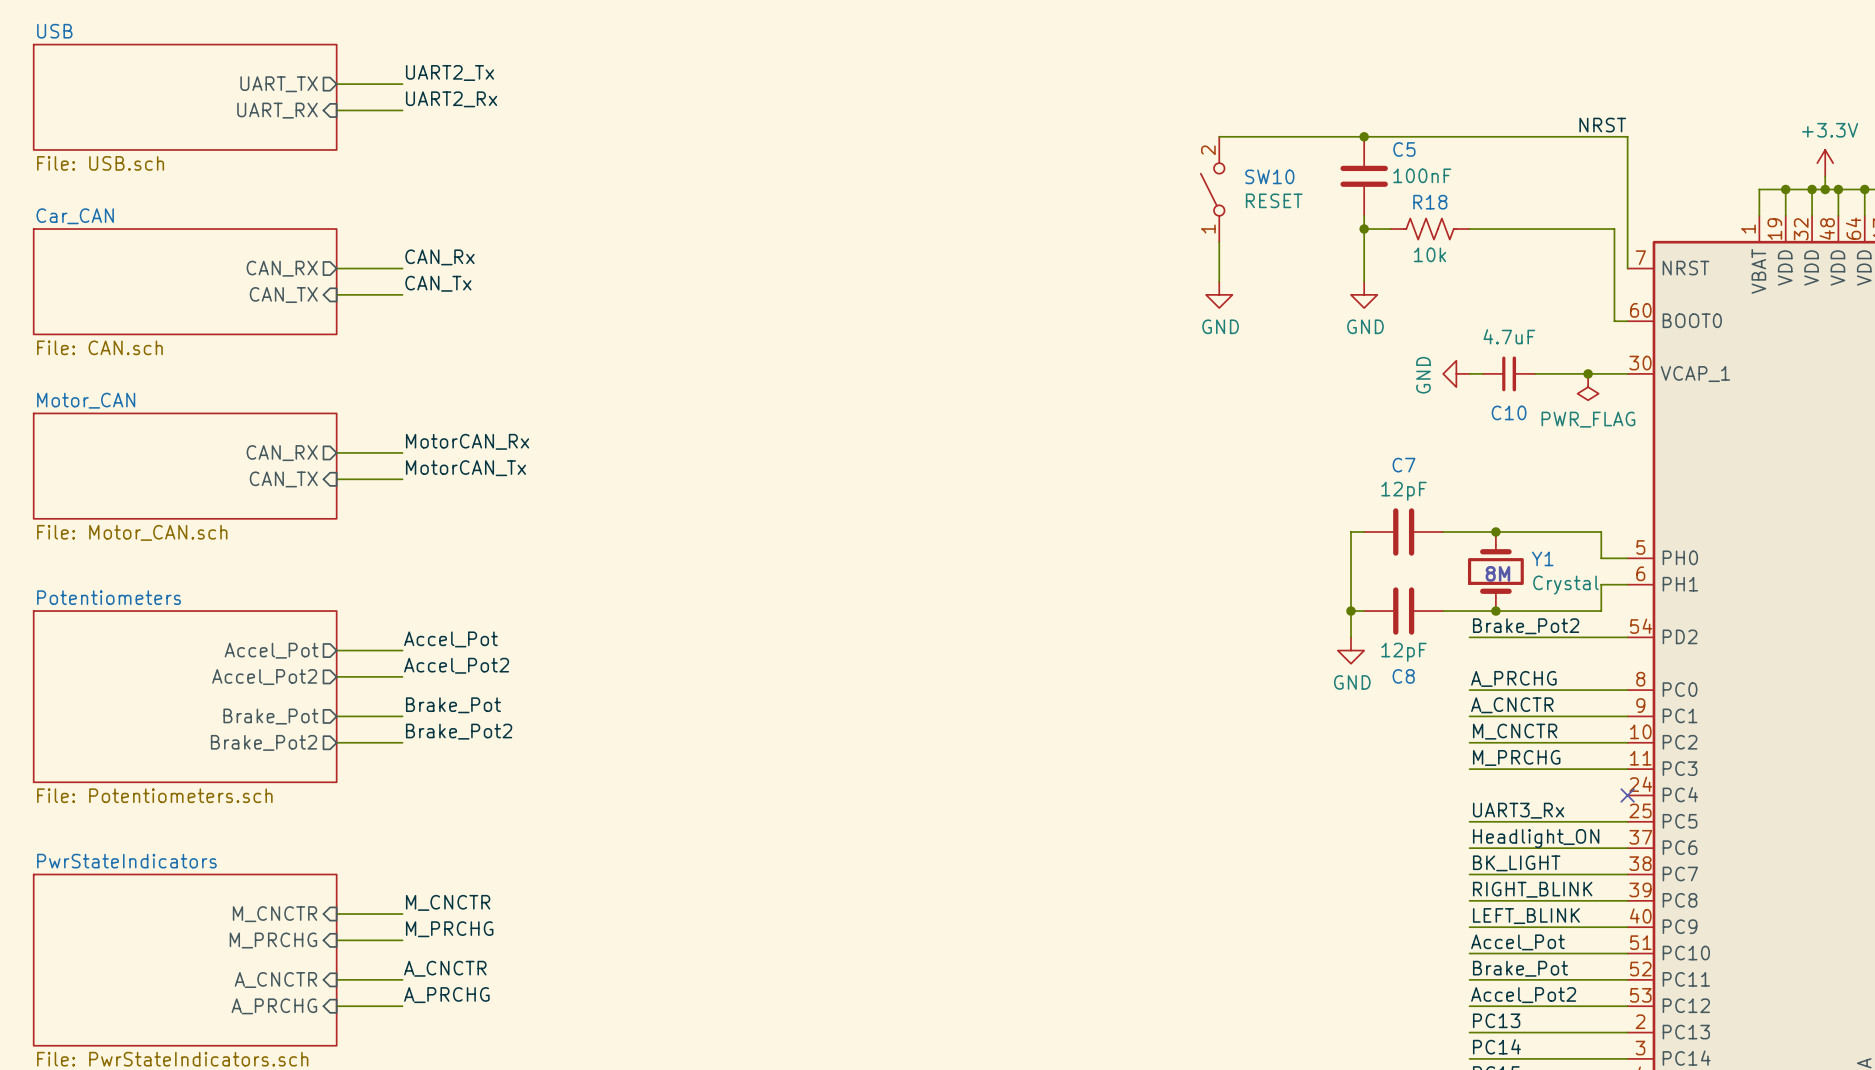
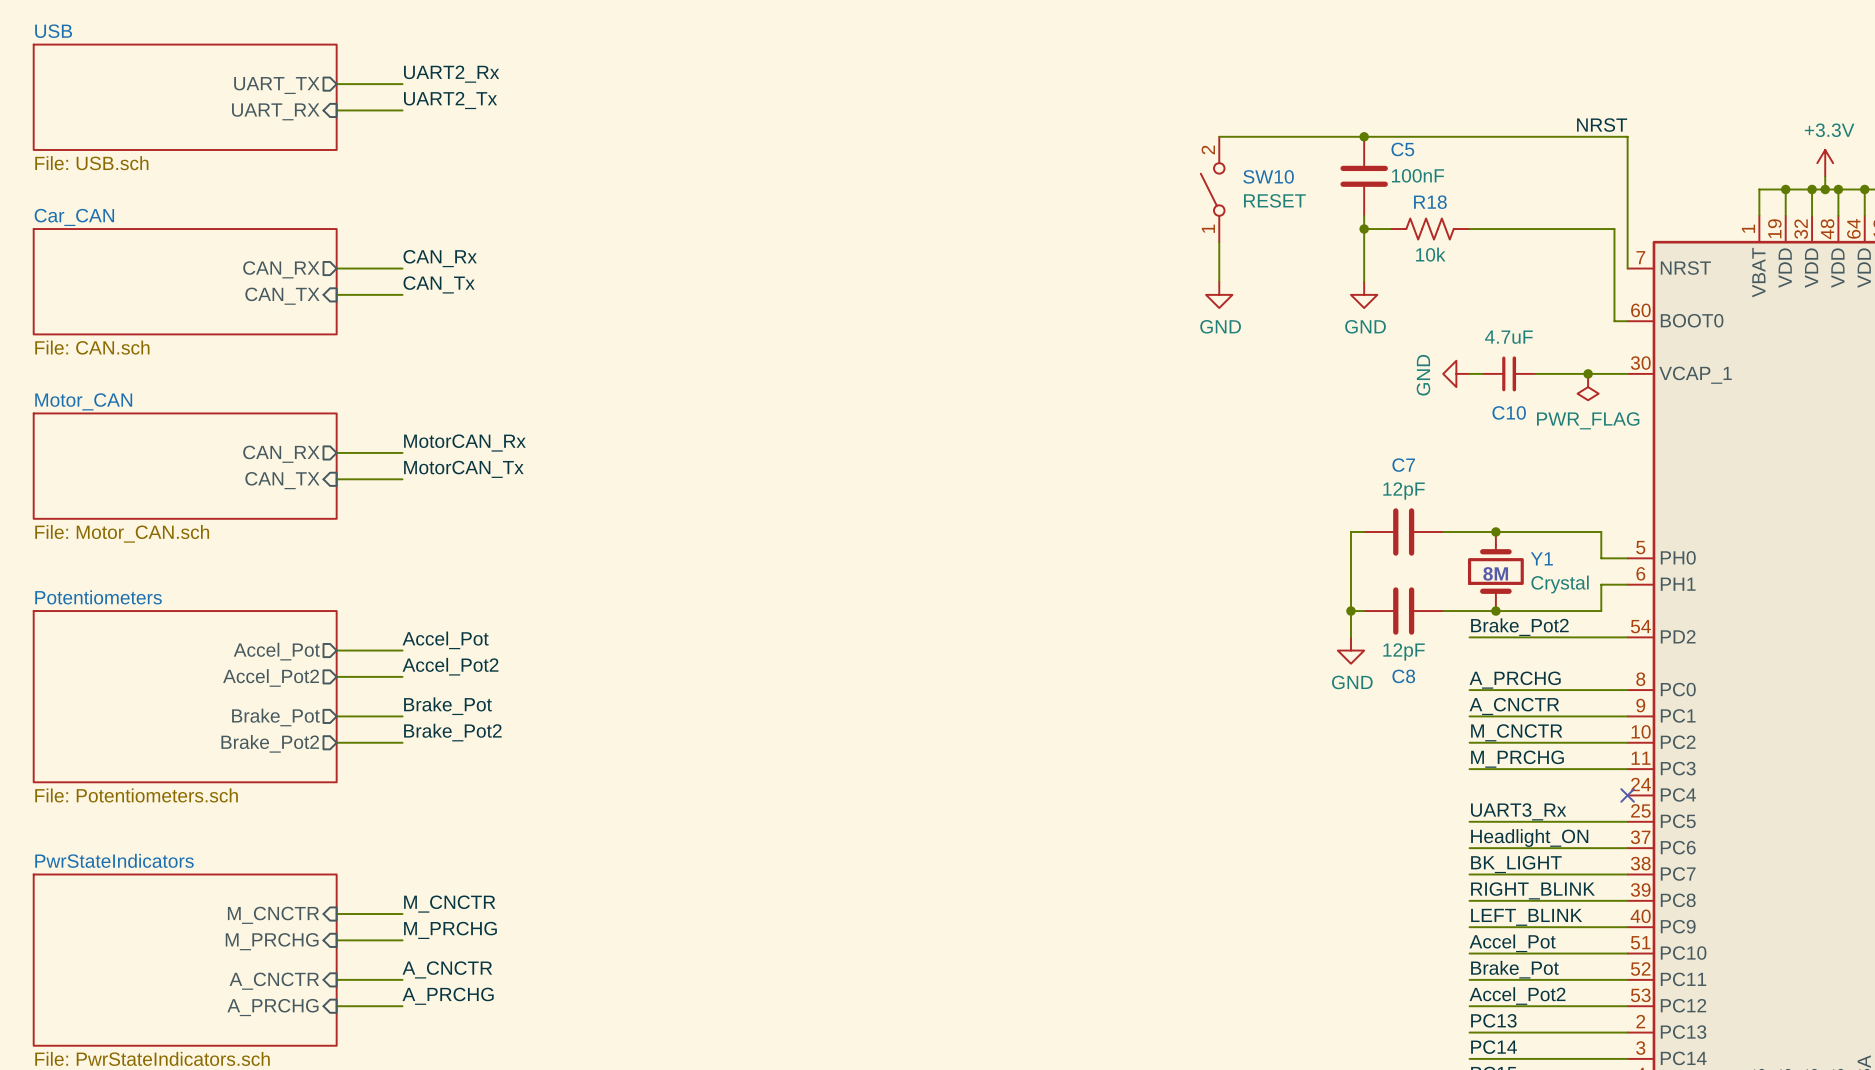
label: UART2_Tx (449, 72) -> UART2_Rx (451, 74)
label: UART2_Rx (451, 99) -> UART2_Tx (450, 100)

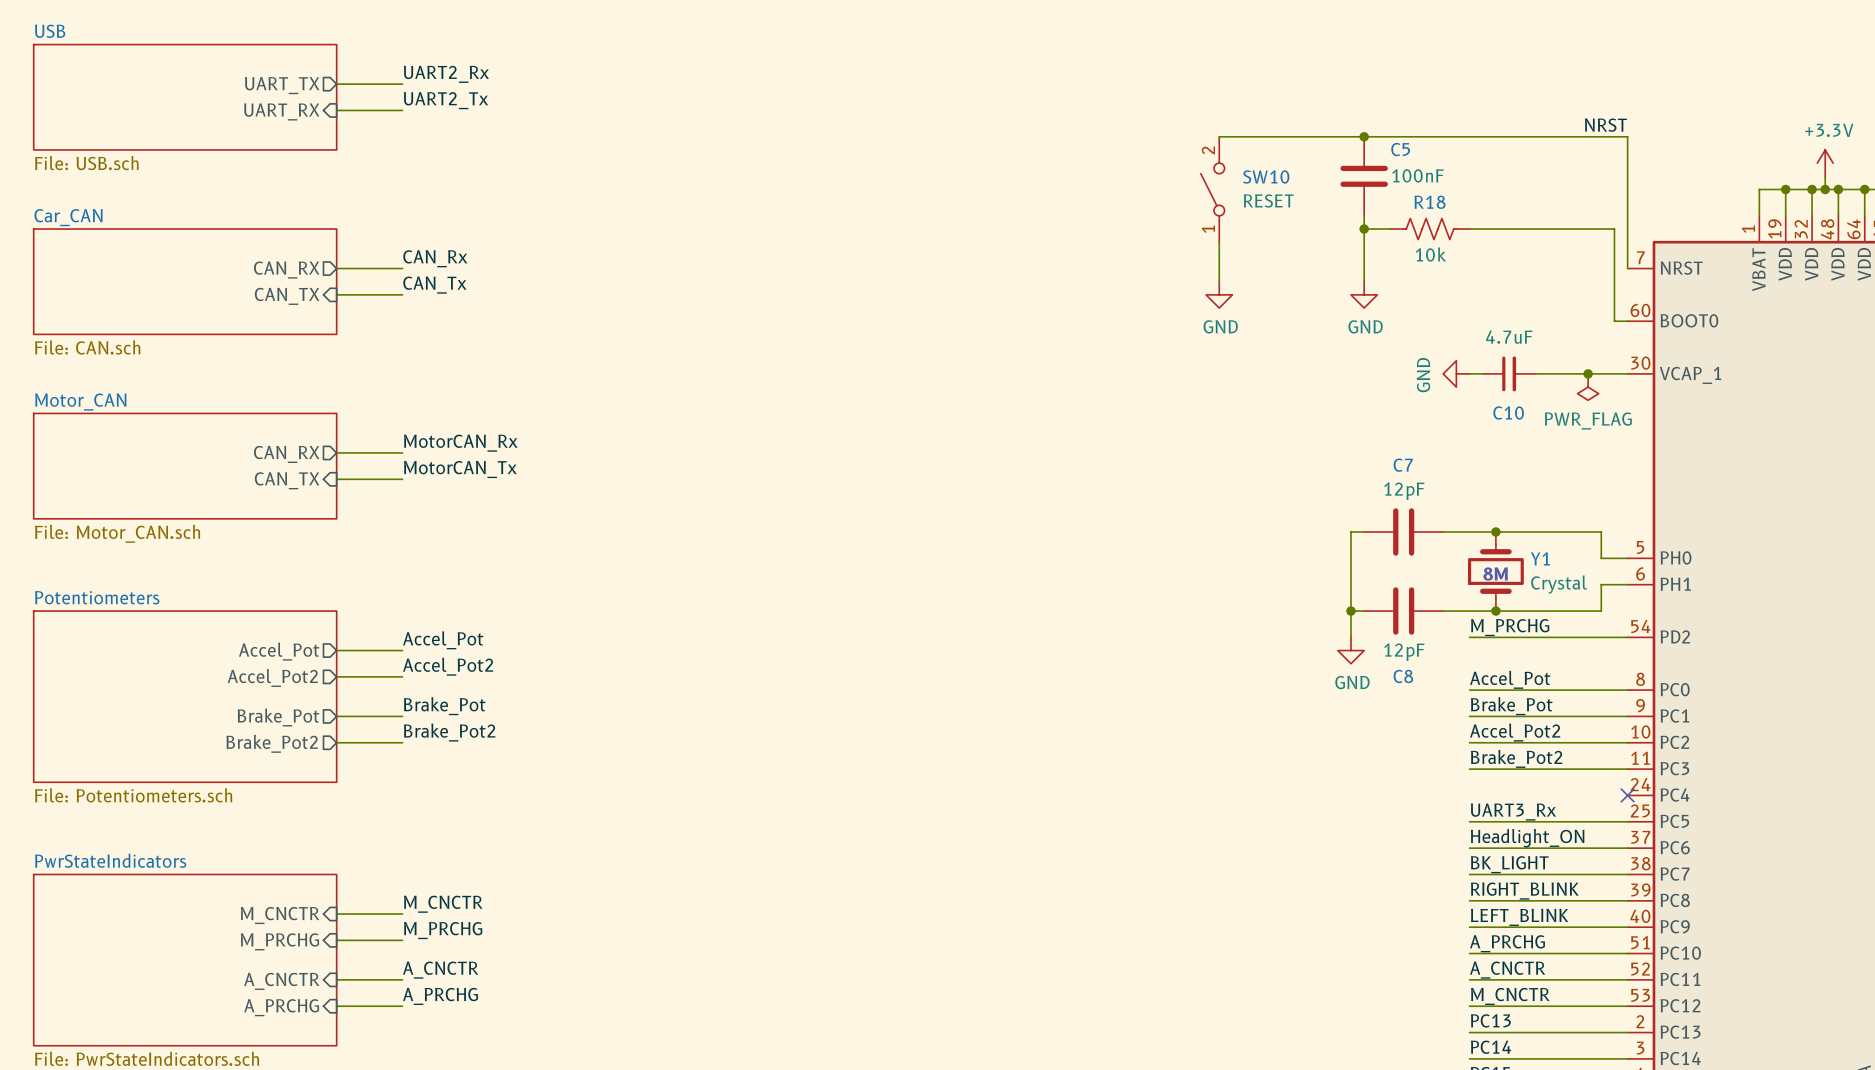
label: Brake_Pot2 (1519, 627) -> M_PRCHG (1510, 627)
label: A_PRCHG (1515, 680) -> Accel_Pot (1510, 679)
label: A_CNCTR (1514, 706) -> Brake_Pot (1511, 706)
label: M_CNCTR (1516, 732) -> Accel_Pot2 (1515, 732)
label: M_PRCHG (1517, 759) -> Brake_Pot2 (1516, 758)
label: Accel_Pot (1512, 943) -> A_PRCHG (1507, 943)
label: Brake_Pot (1514, 969) -> A_CNCTR (1507, 970)
label: Accel_Pot2 (1517, 996) -> M_CNCTR (1510, 996)

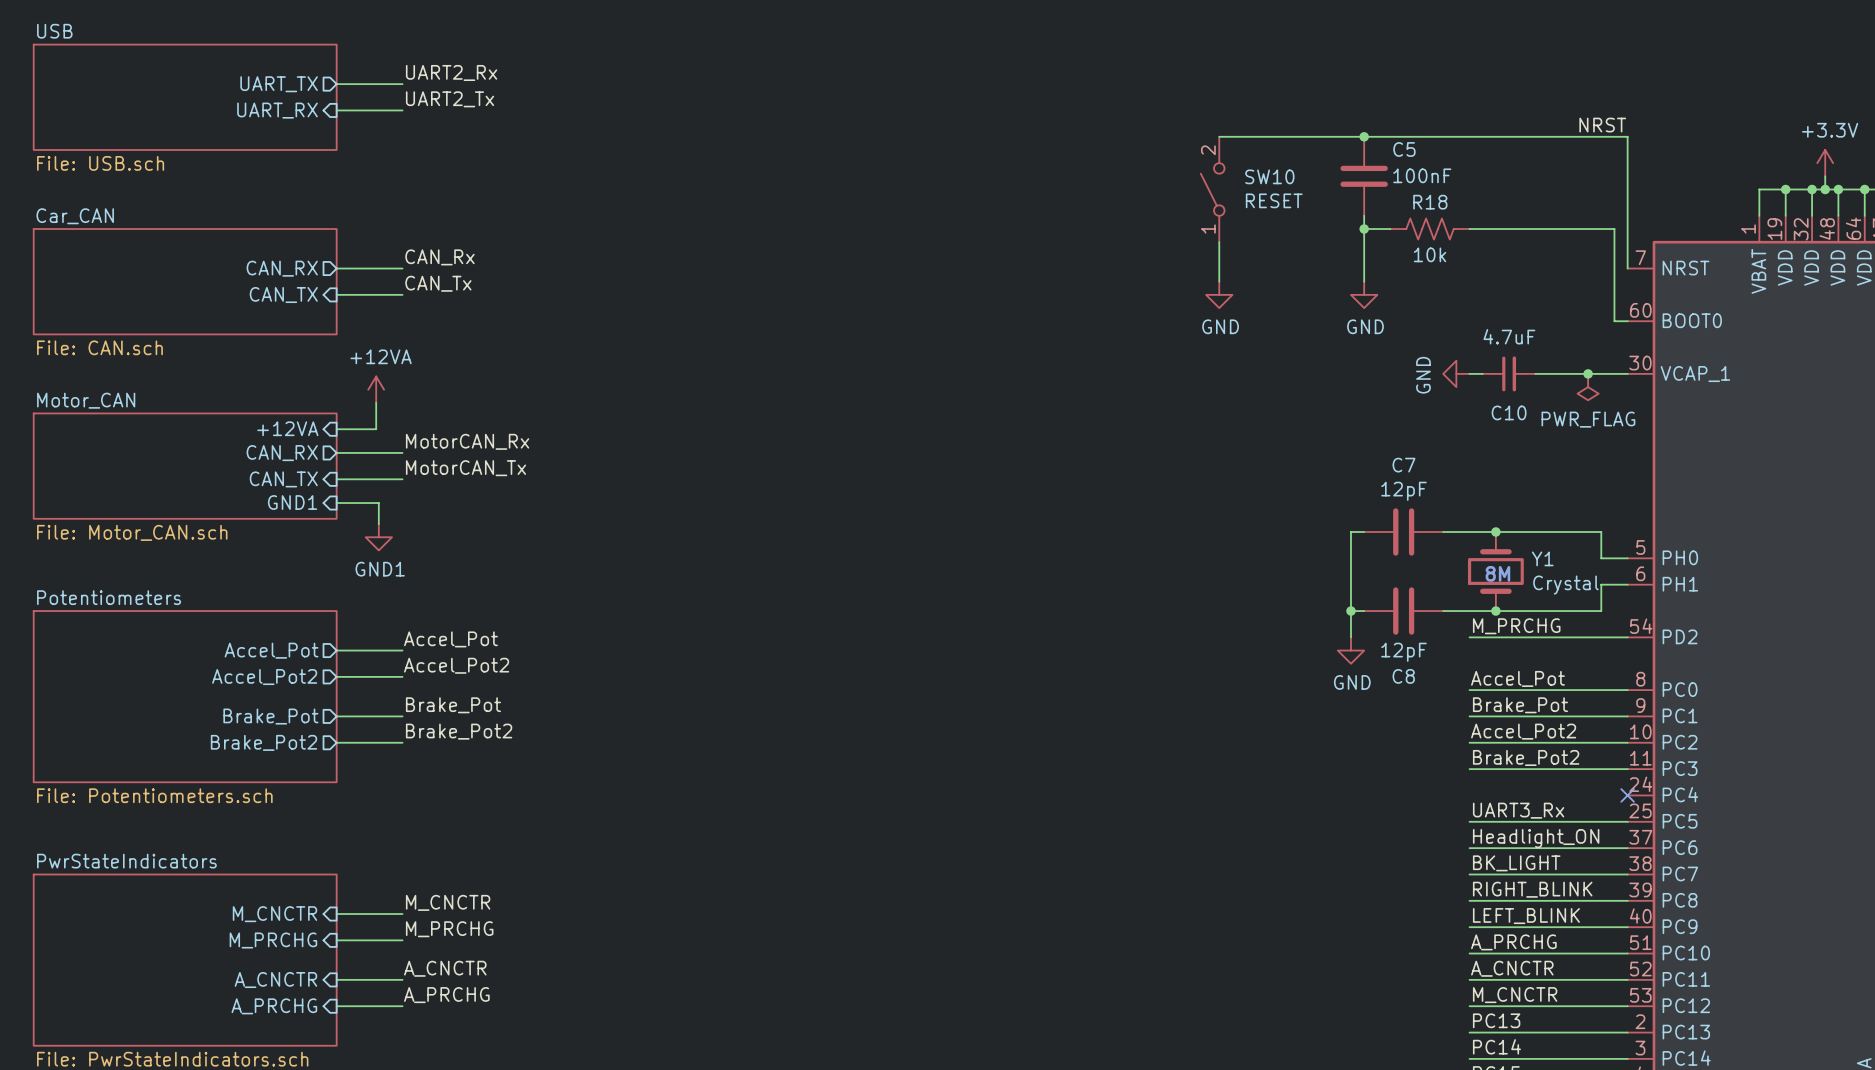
power symbol: none -> +12VA (376, 389)
wire: none -> (376, 402) (376, 429) (336, 429)
sheet pin: none -> +12VA (287, 428)
sheet pin: none -> GND1 (292, 502)
wire: none -> (336, 503) (378, 503) (378, 524)
power symbol: none -> GND1 (378, 537)

